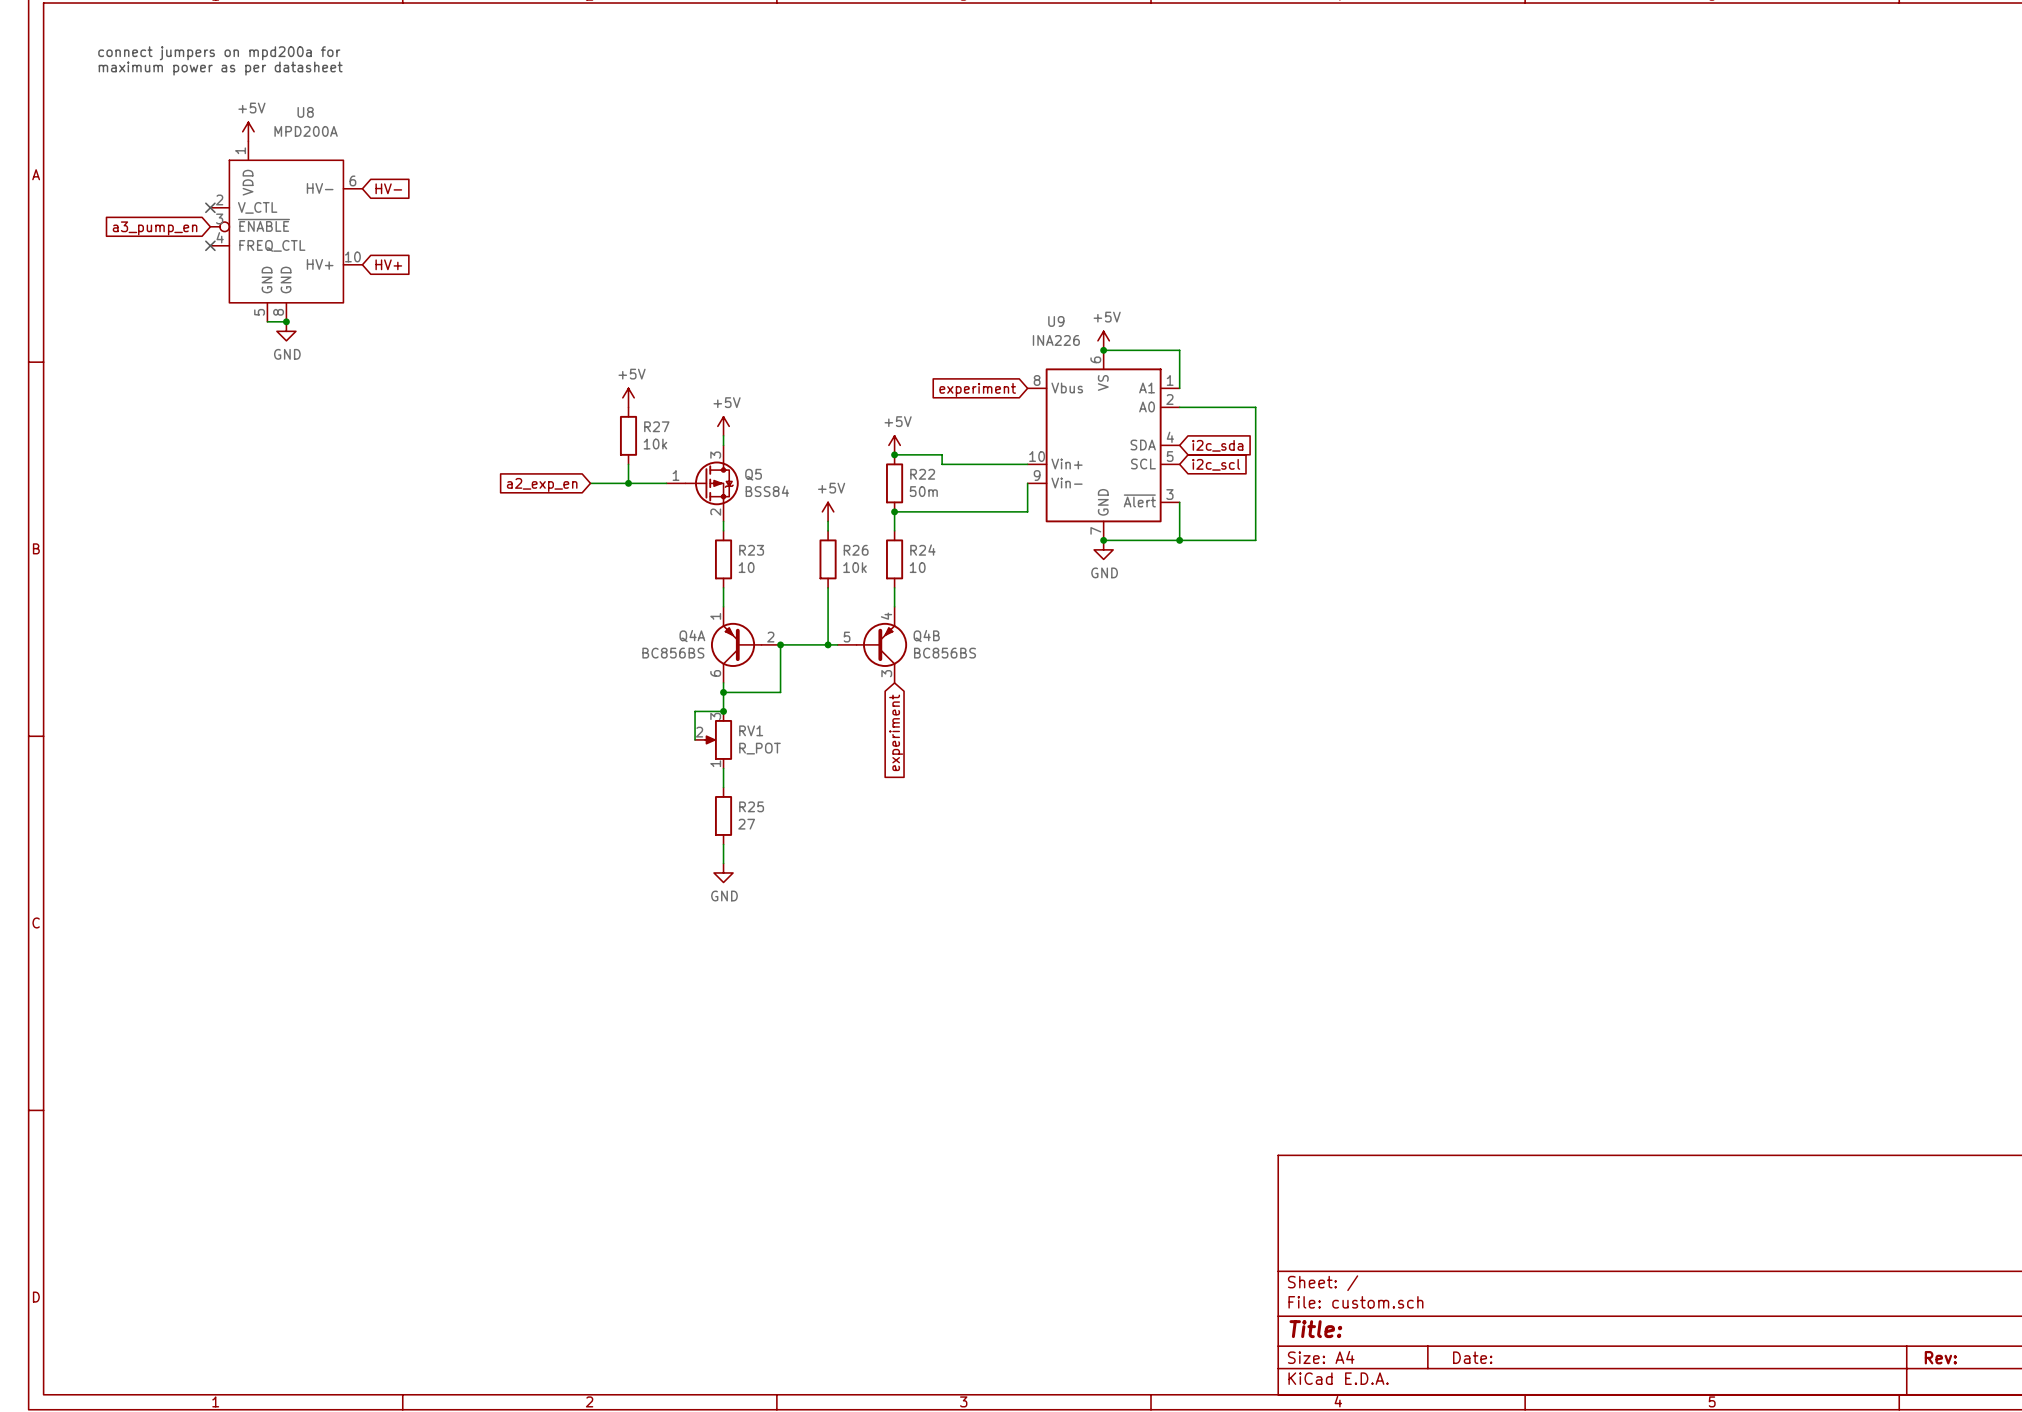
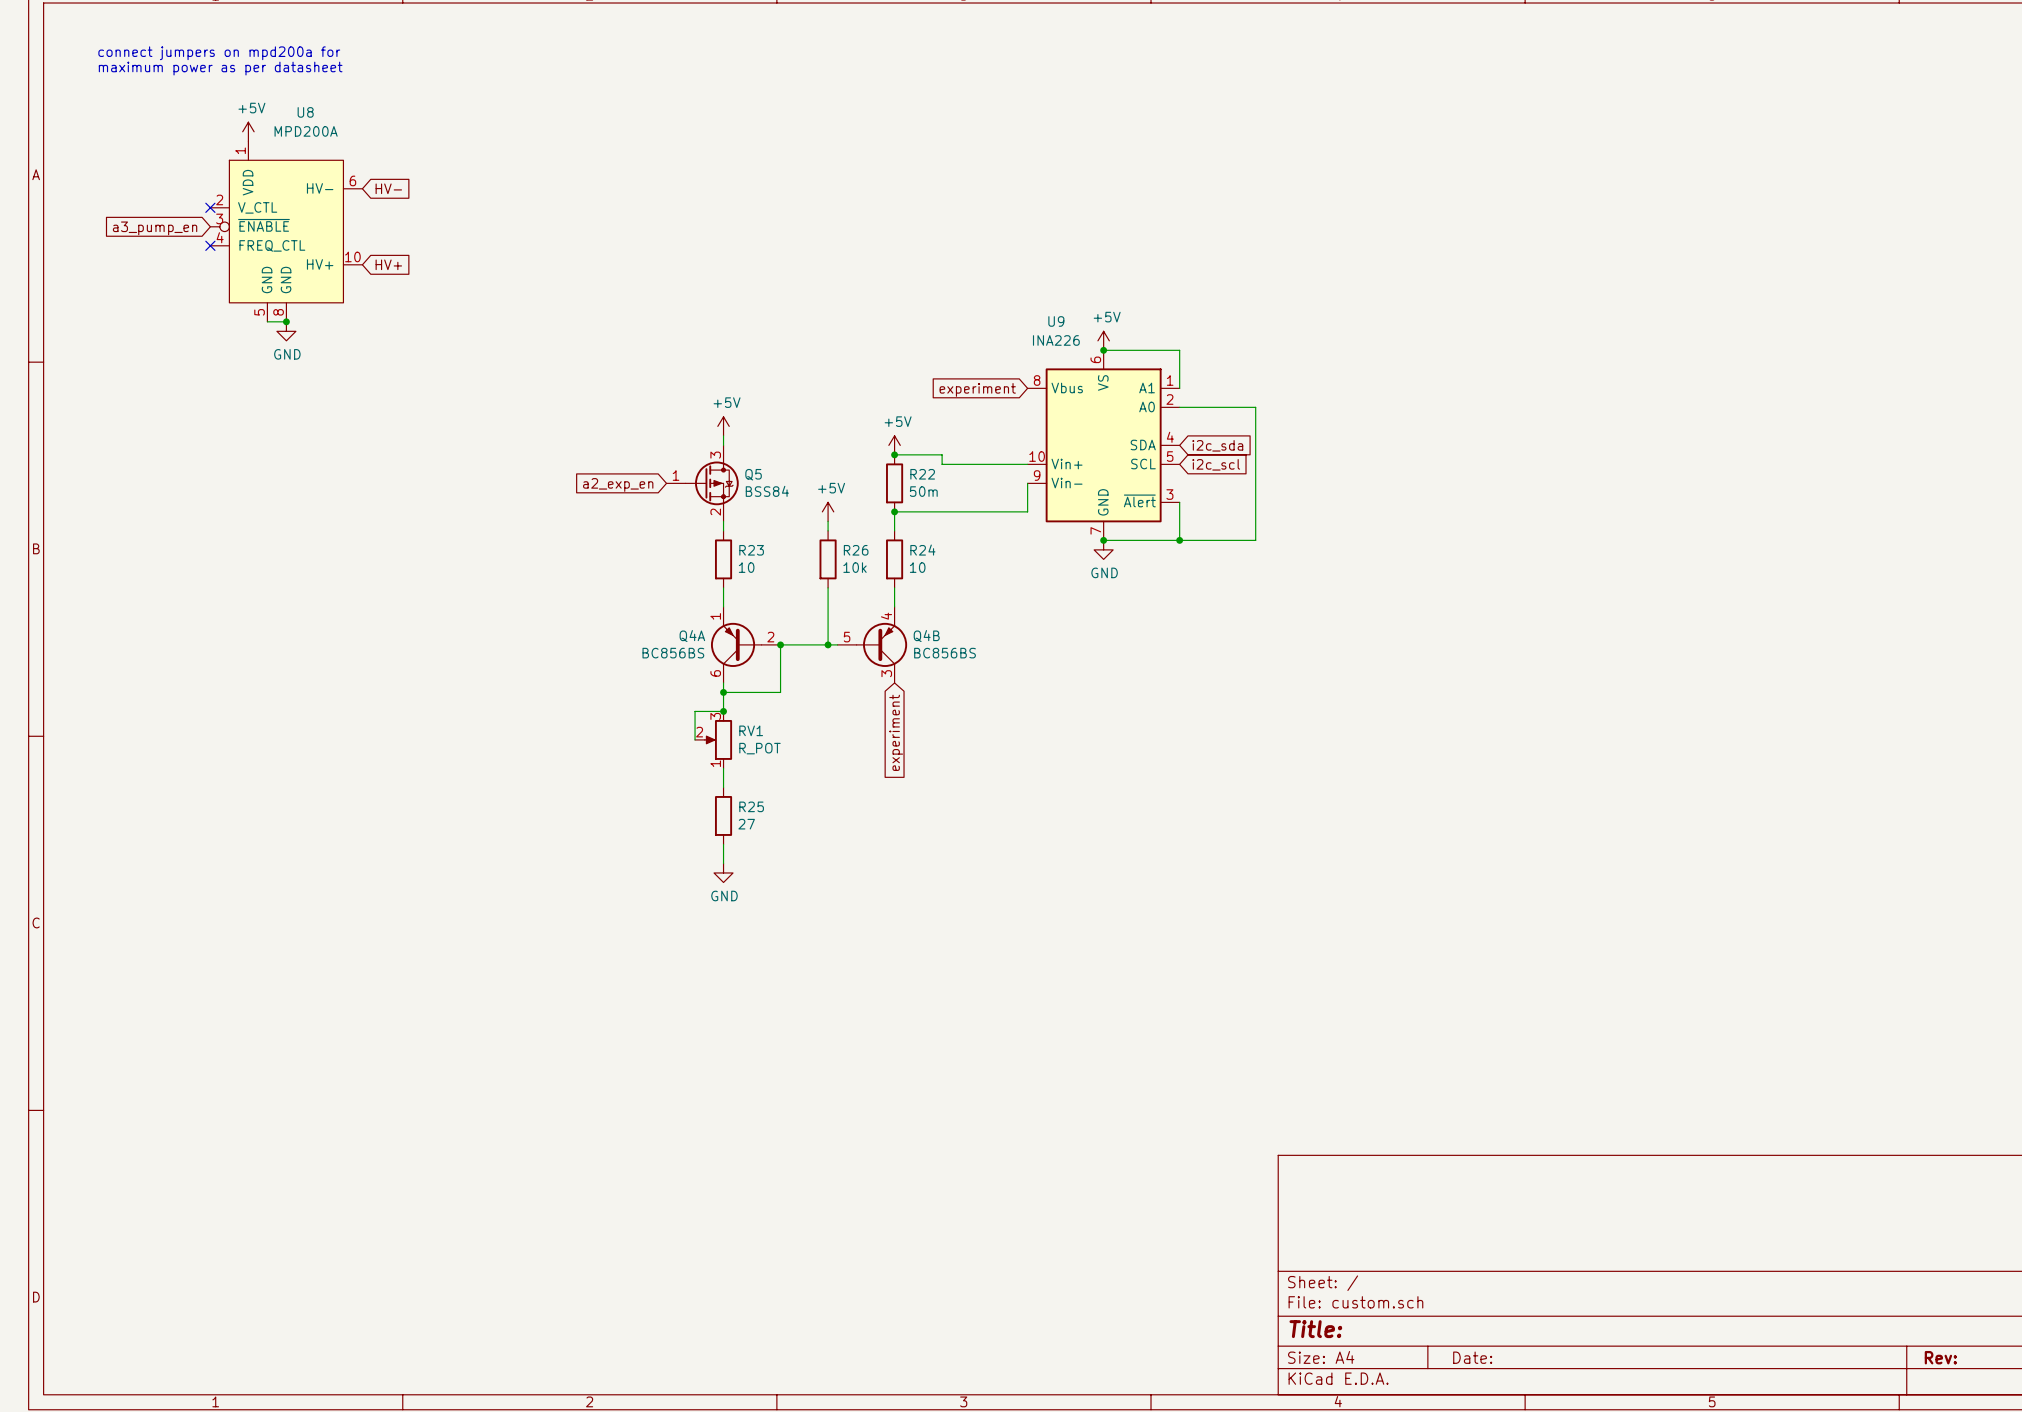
power symbol: +5V (628, 397) -> none
R27: 10k (628, 435) -> none
wire: (628, 464) (628, 483) -> none
wire: (590, 483) (666, 483) -> none
junction: (628, 483) -> none
global label position: a2_exp_en (542, 484) -> a2_exp_en (618, 484)

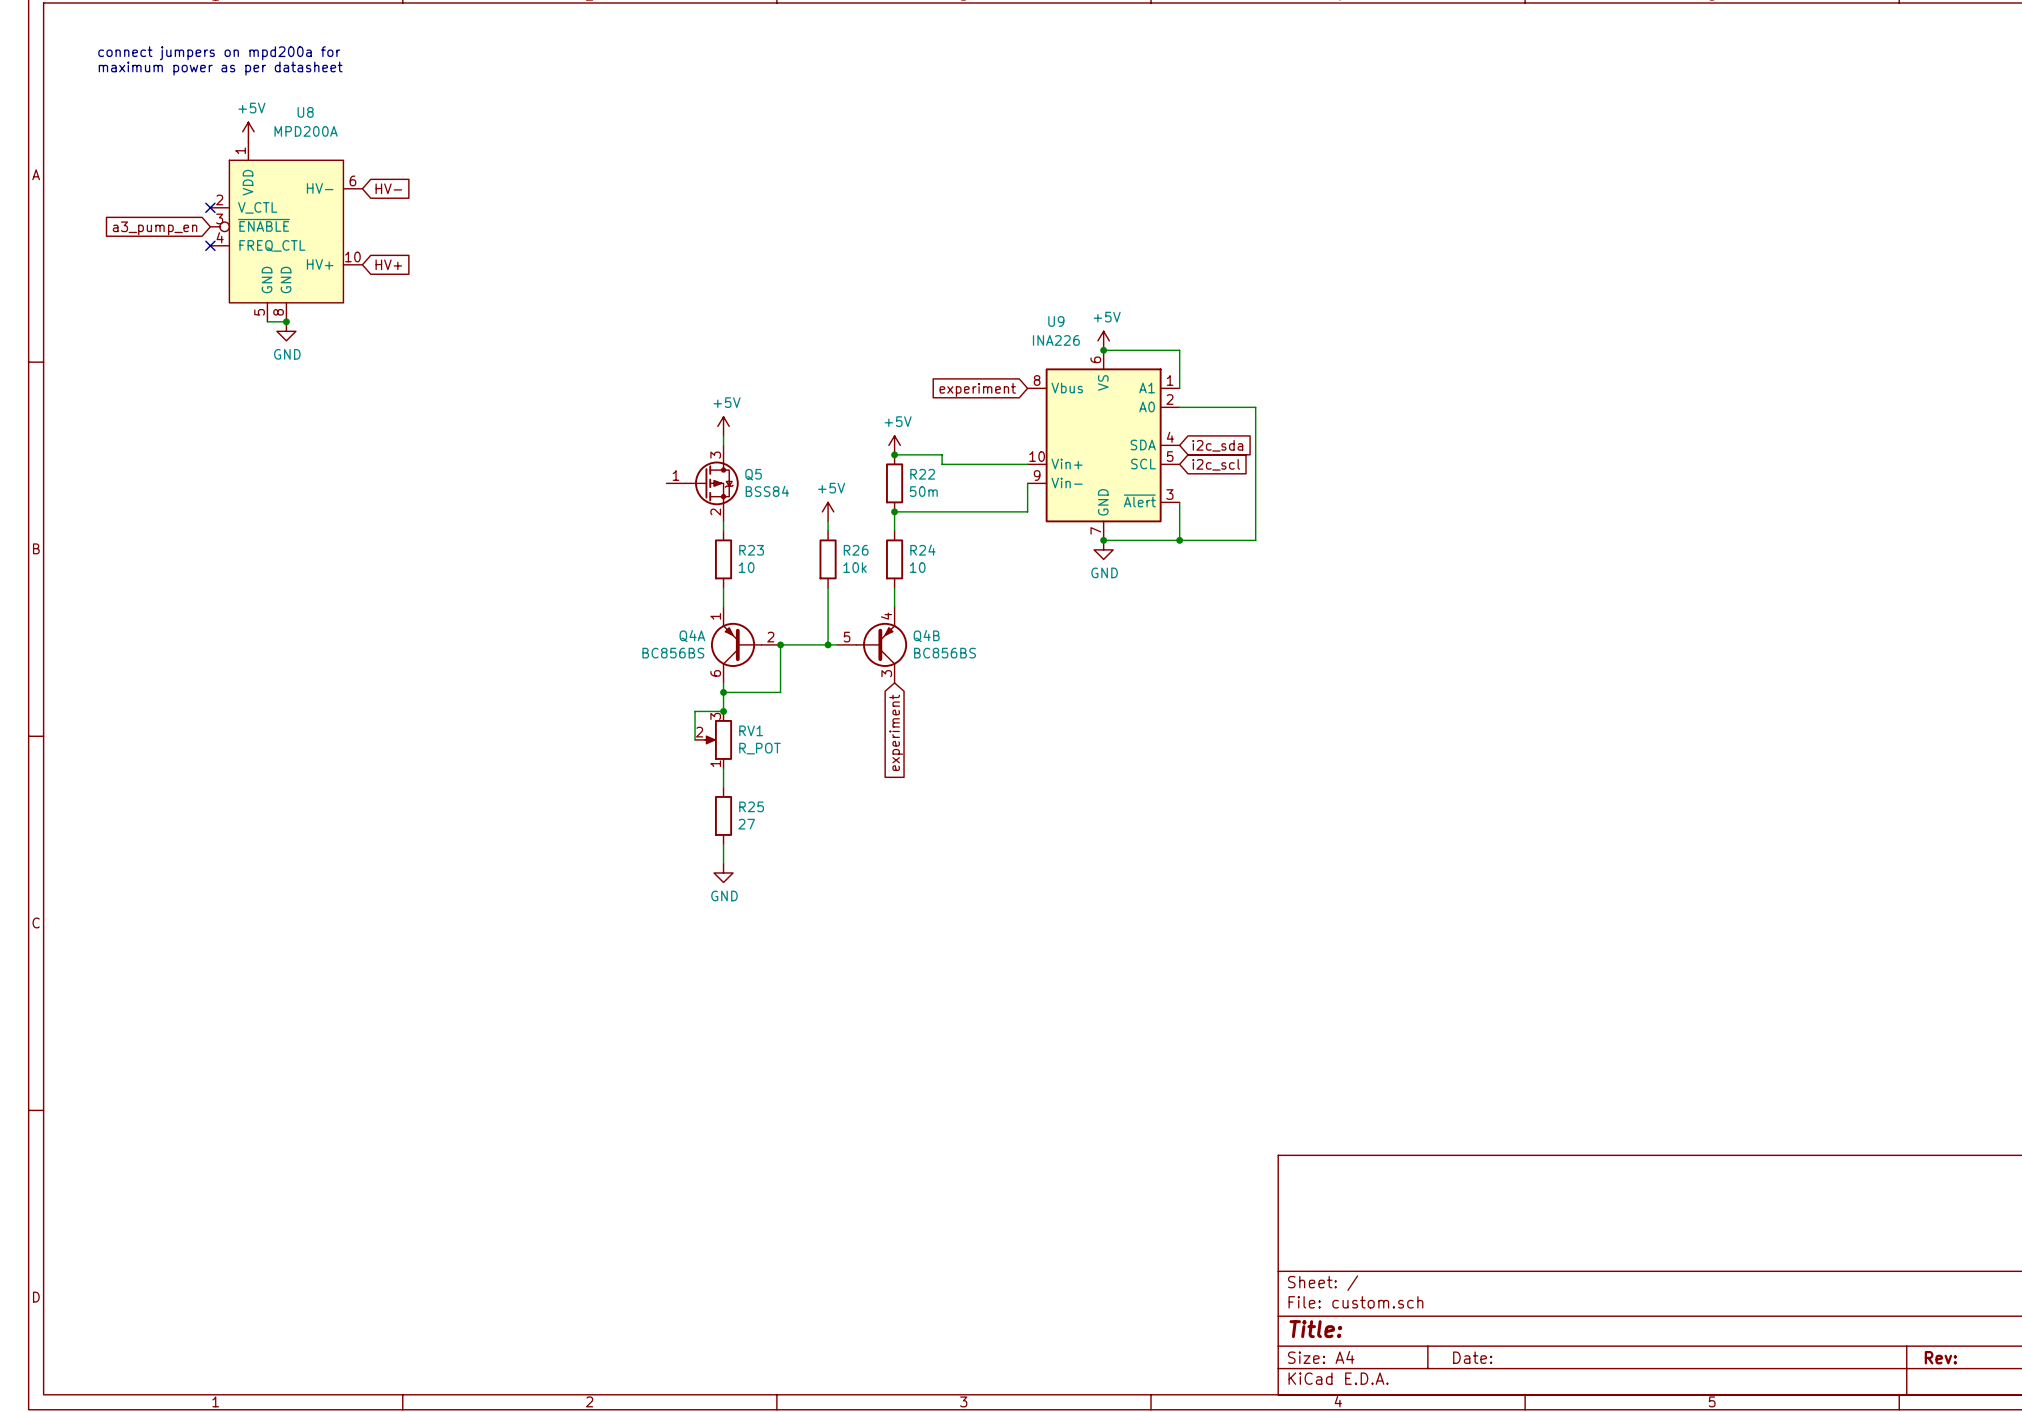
global label: a2_exp_en (618, 484) -> none

